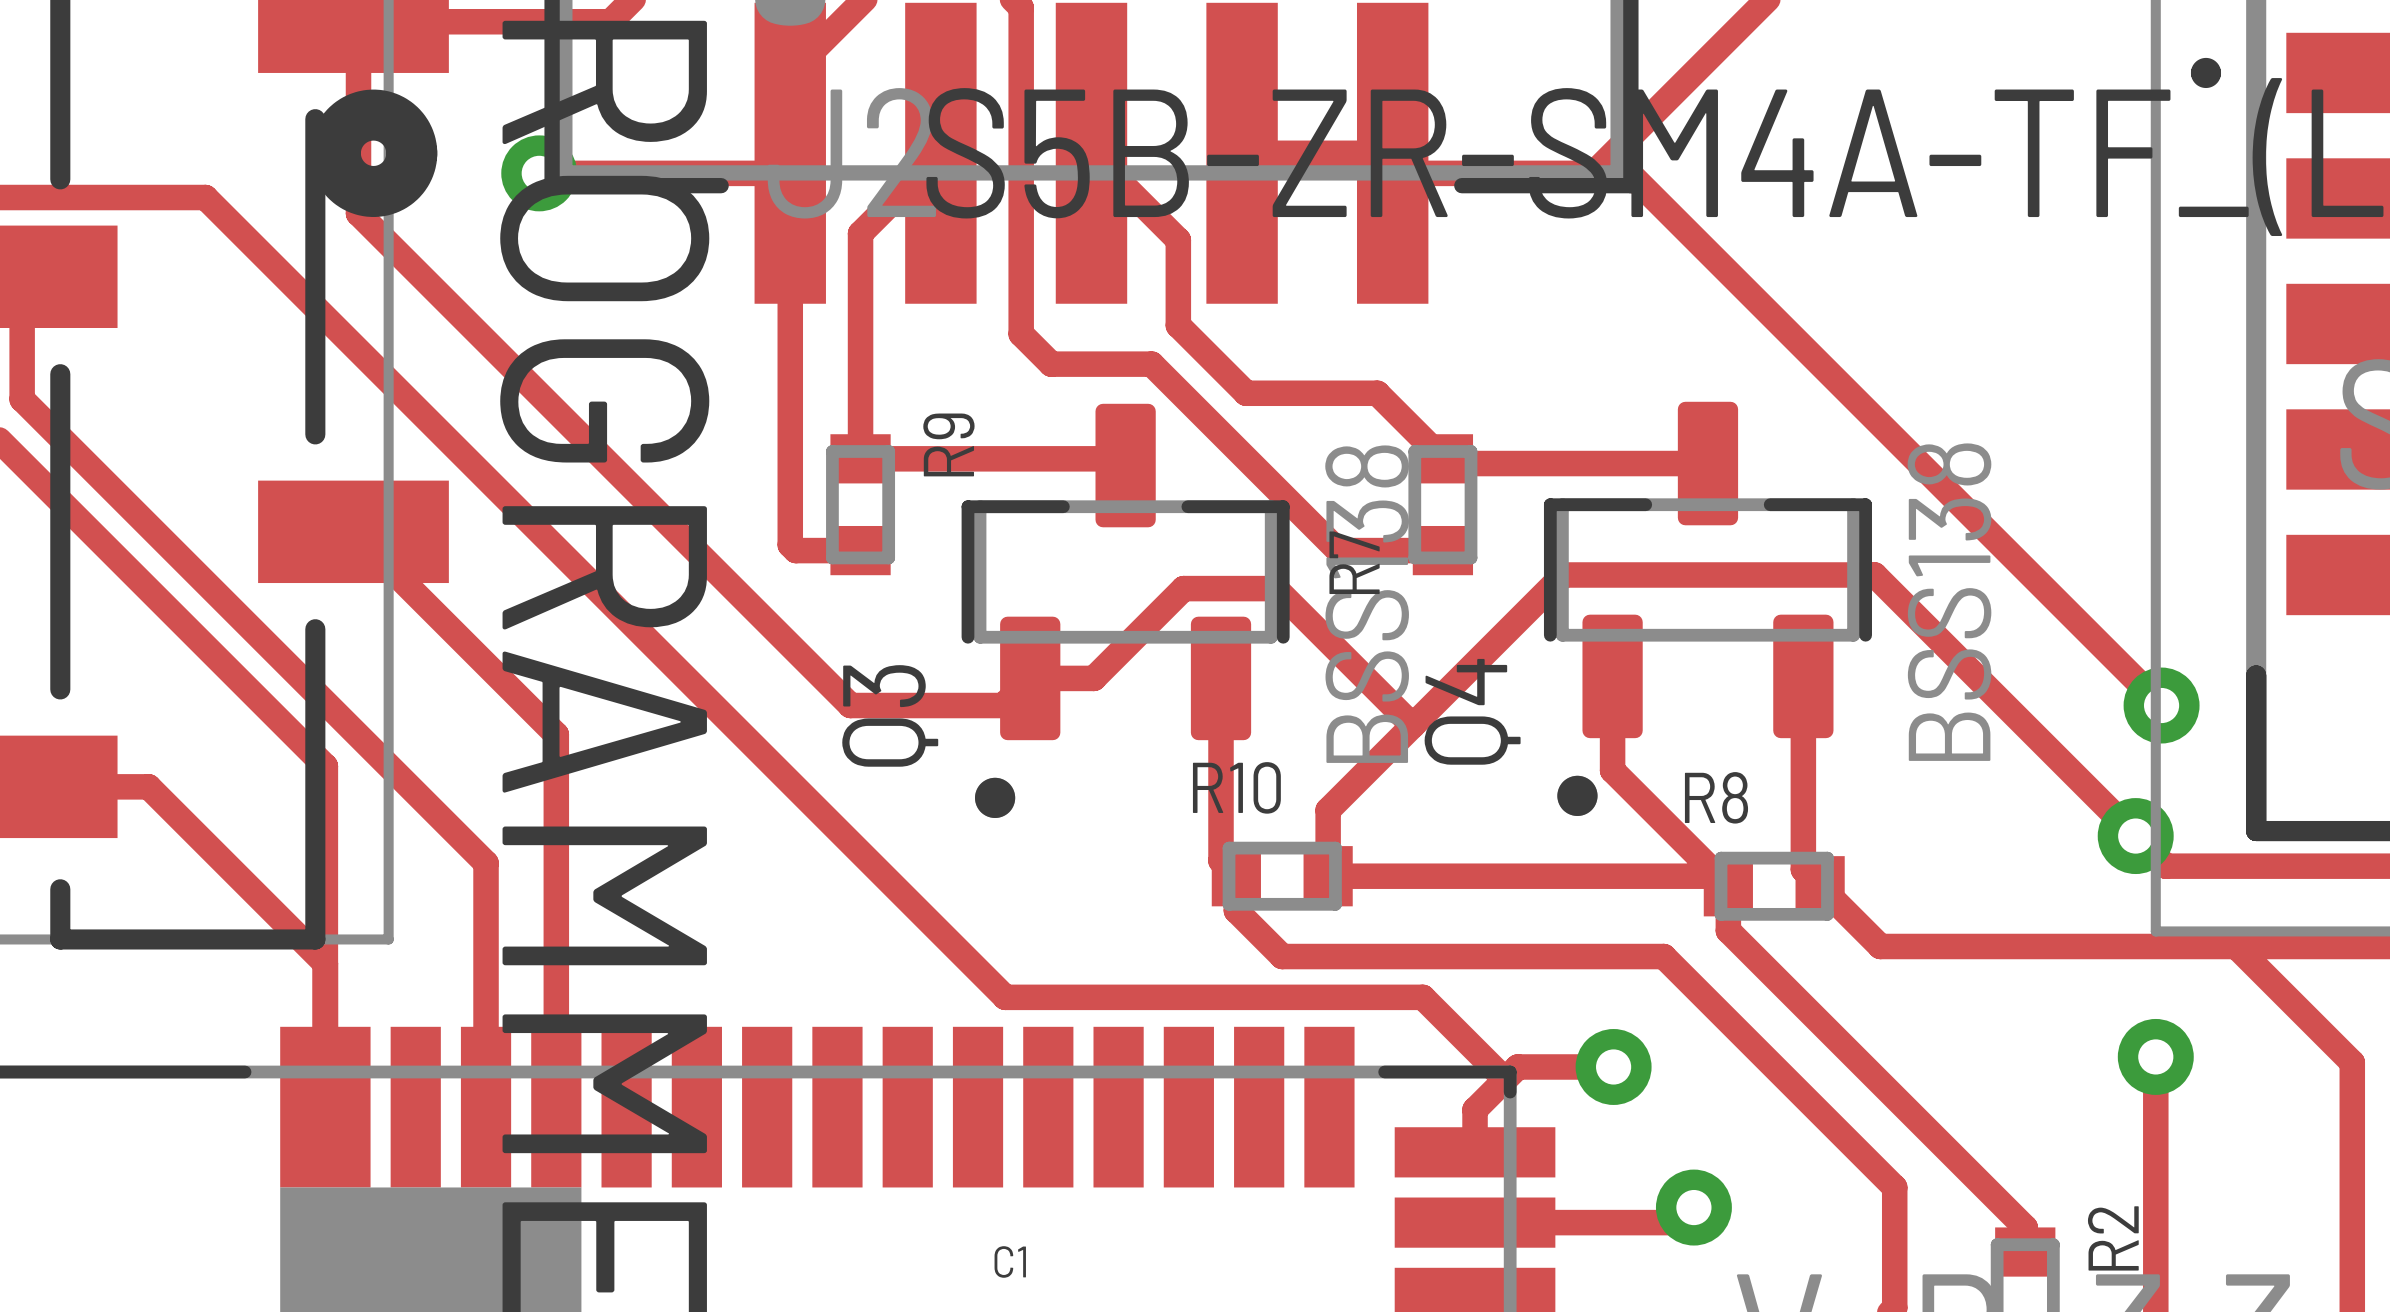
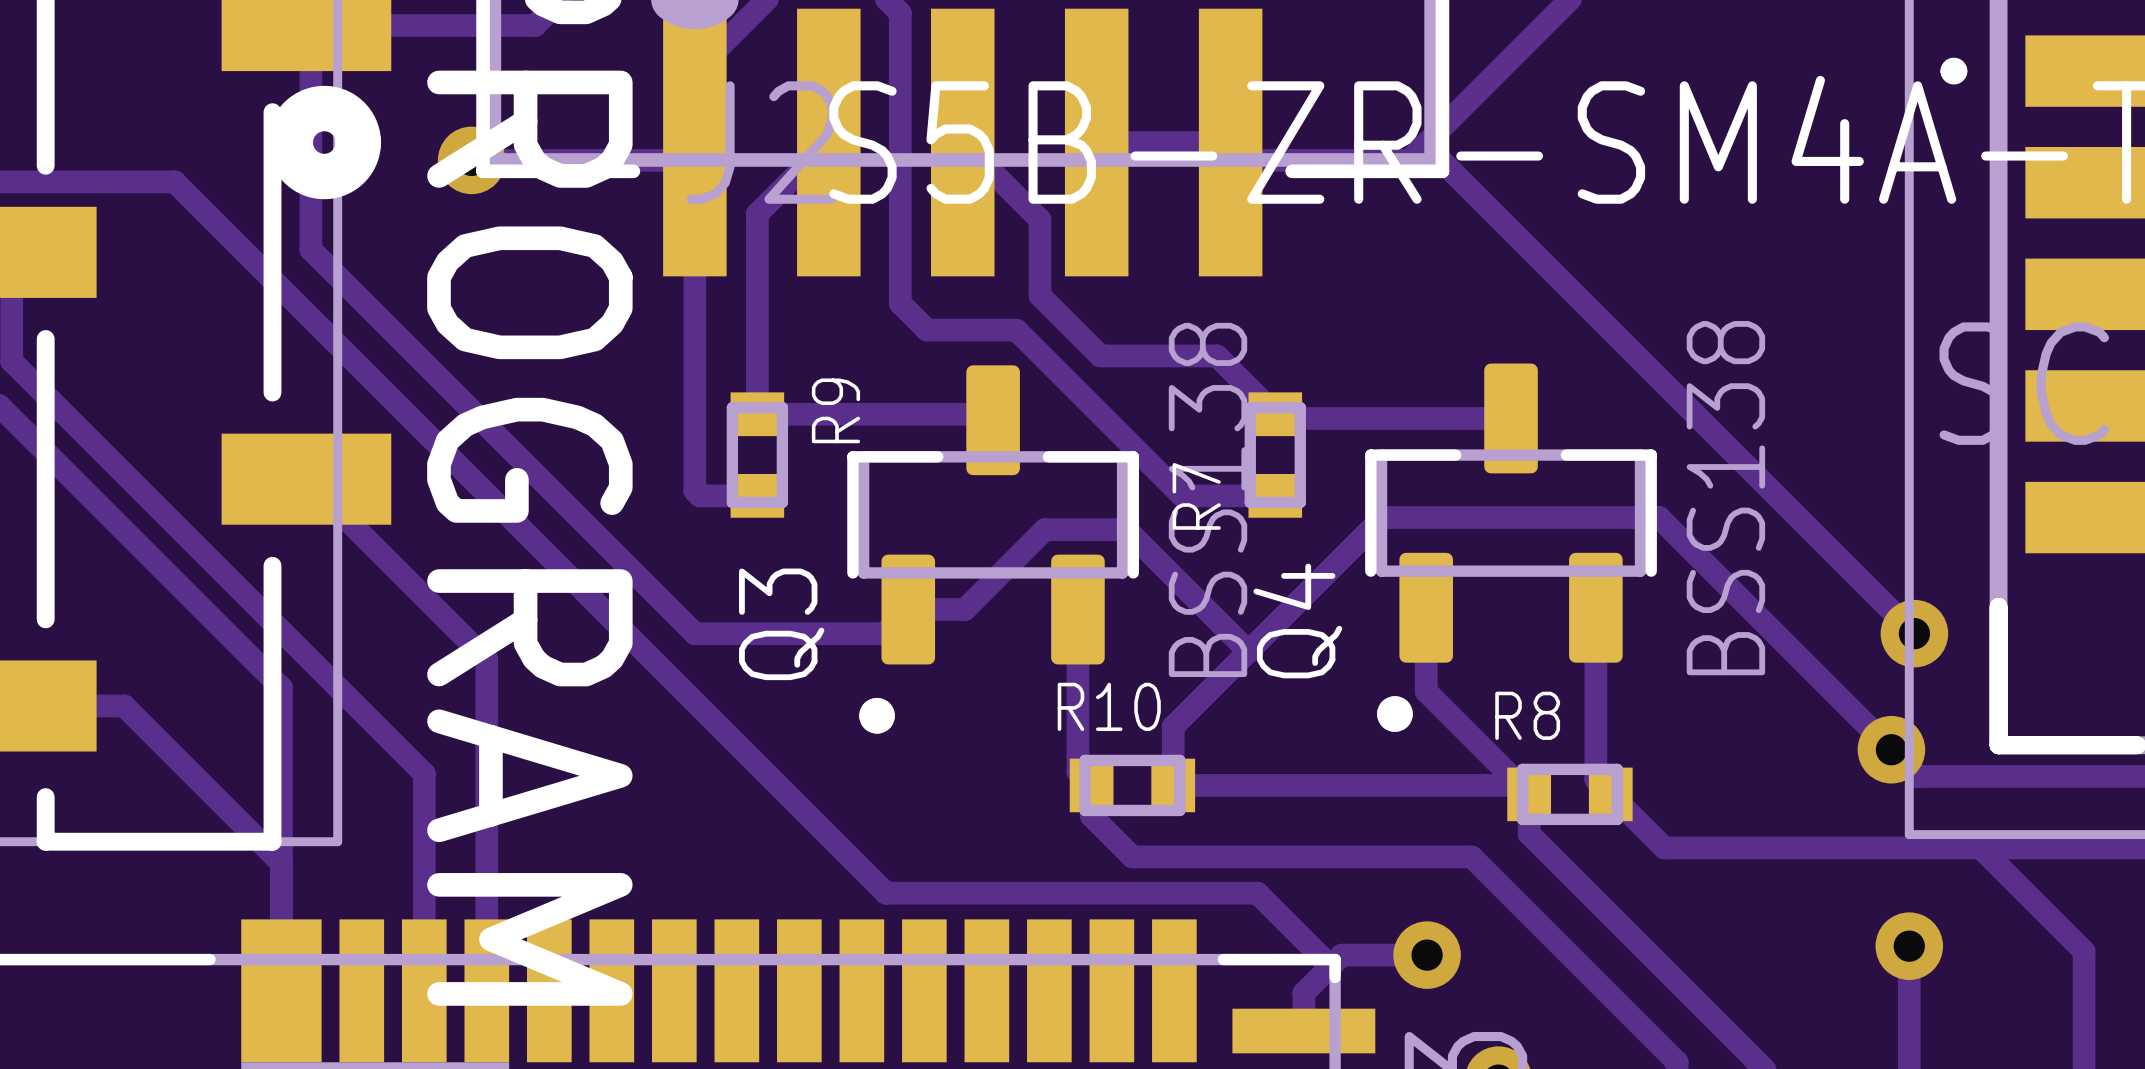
track: (358, 213) (850, 705) -> (310, 196) (310, 249) (694, 633) (748, 633)

